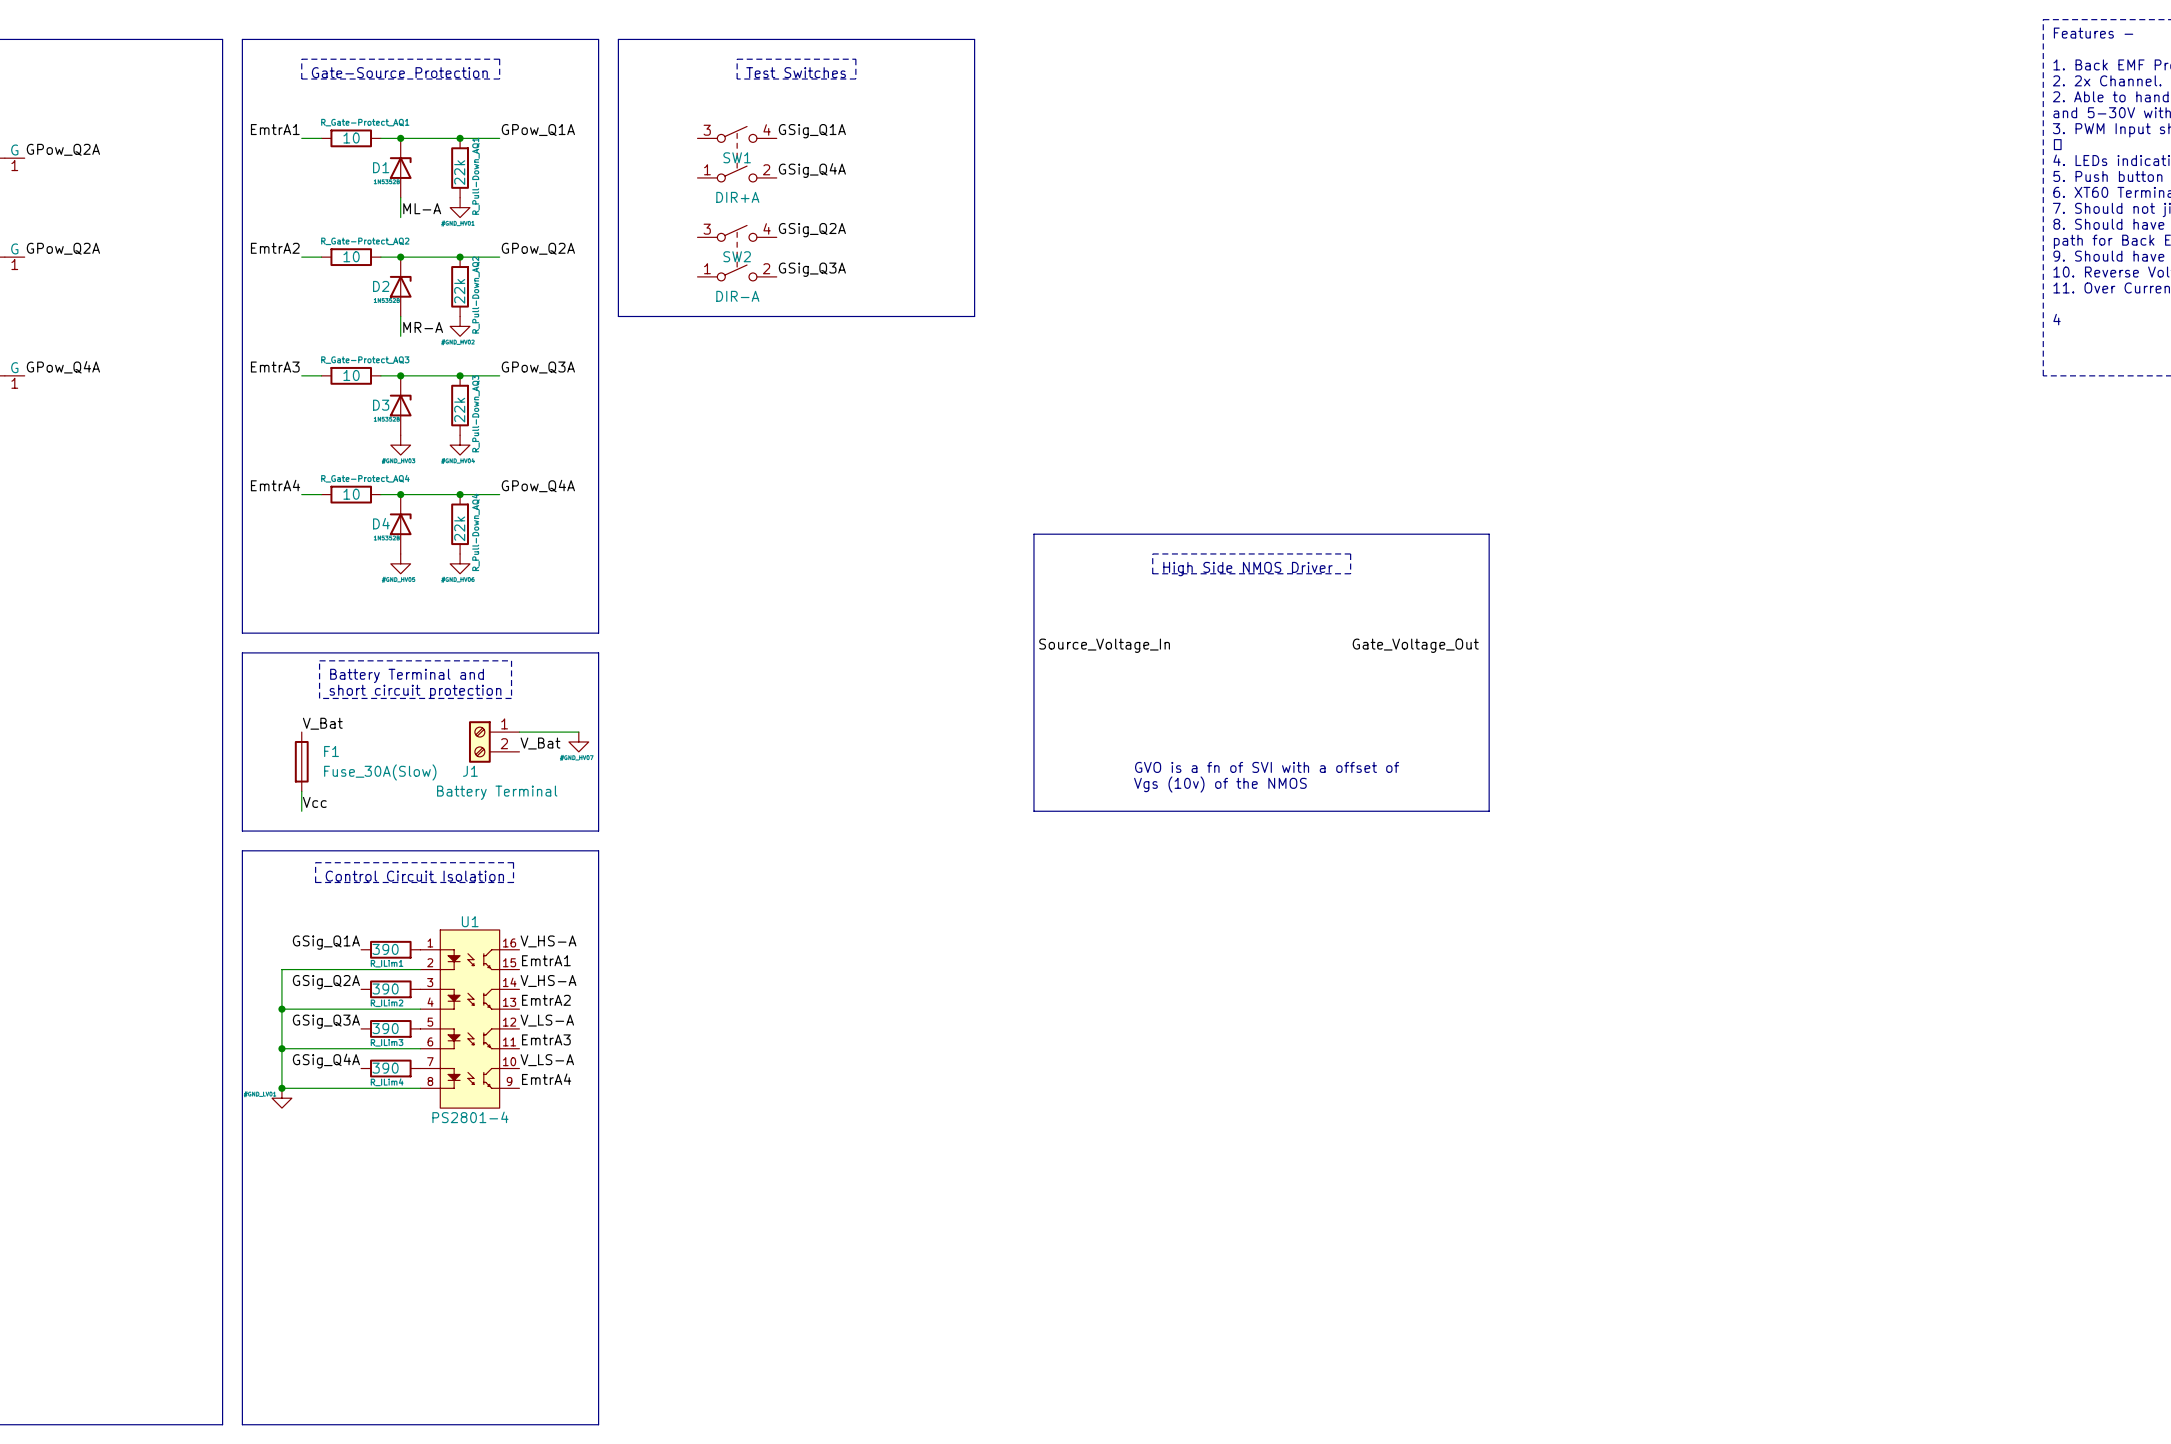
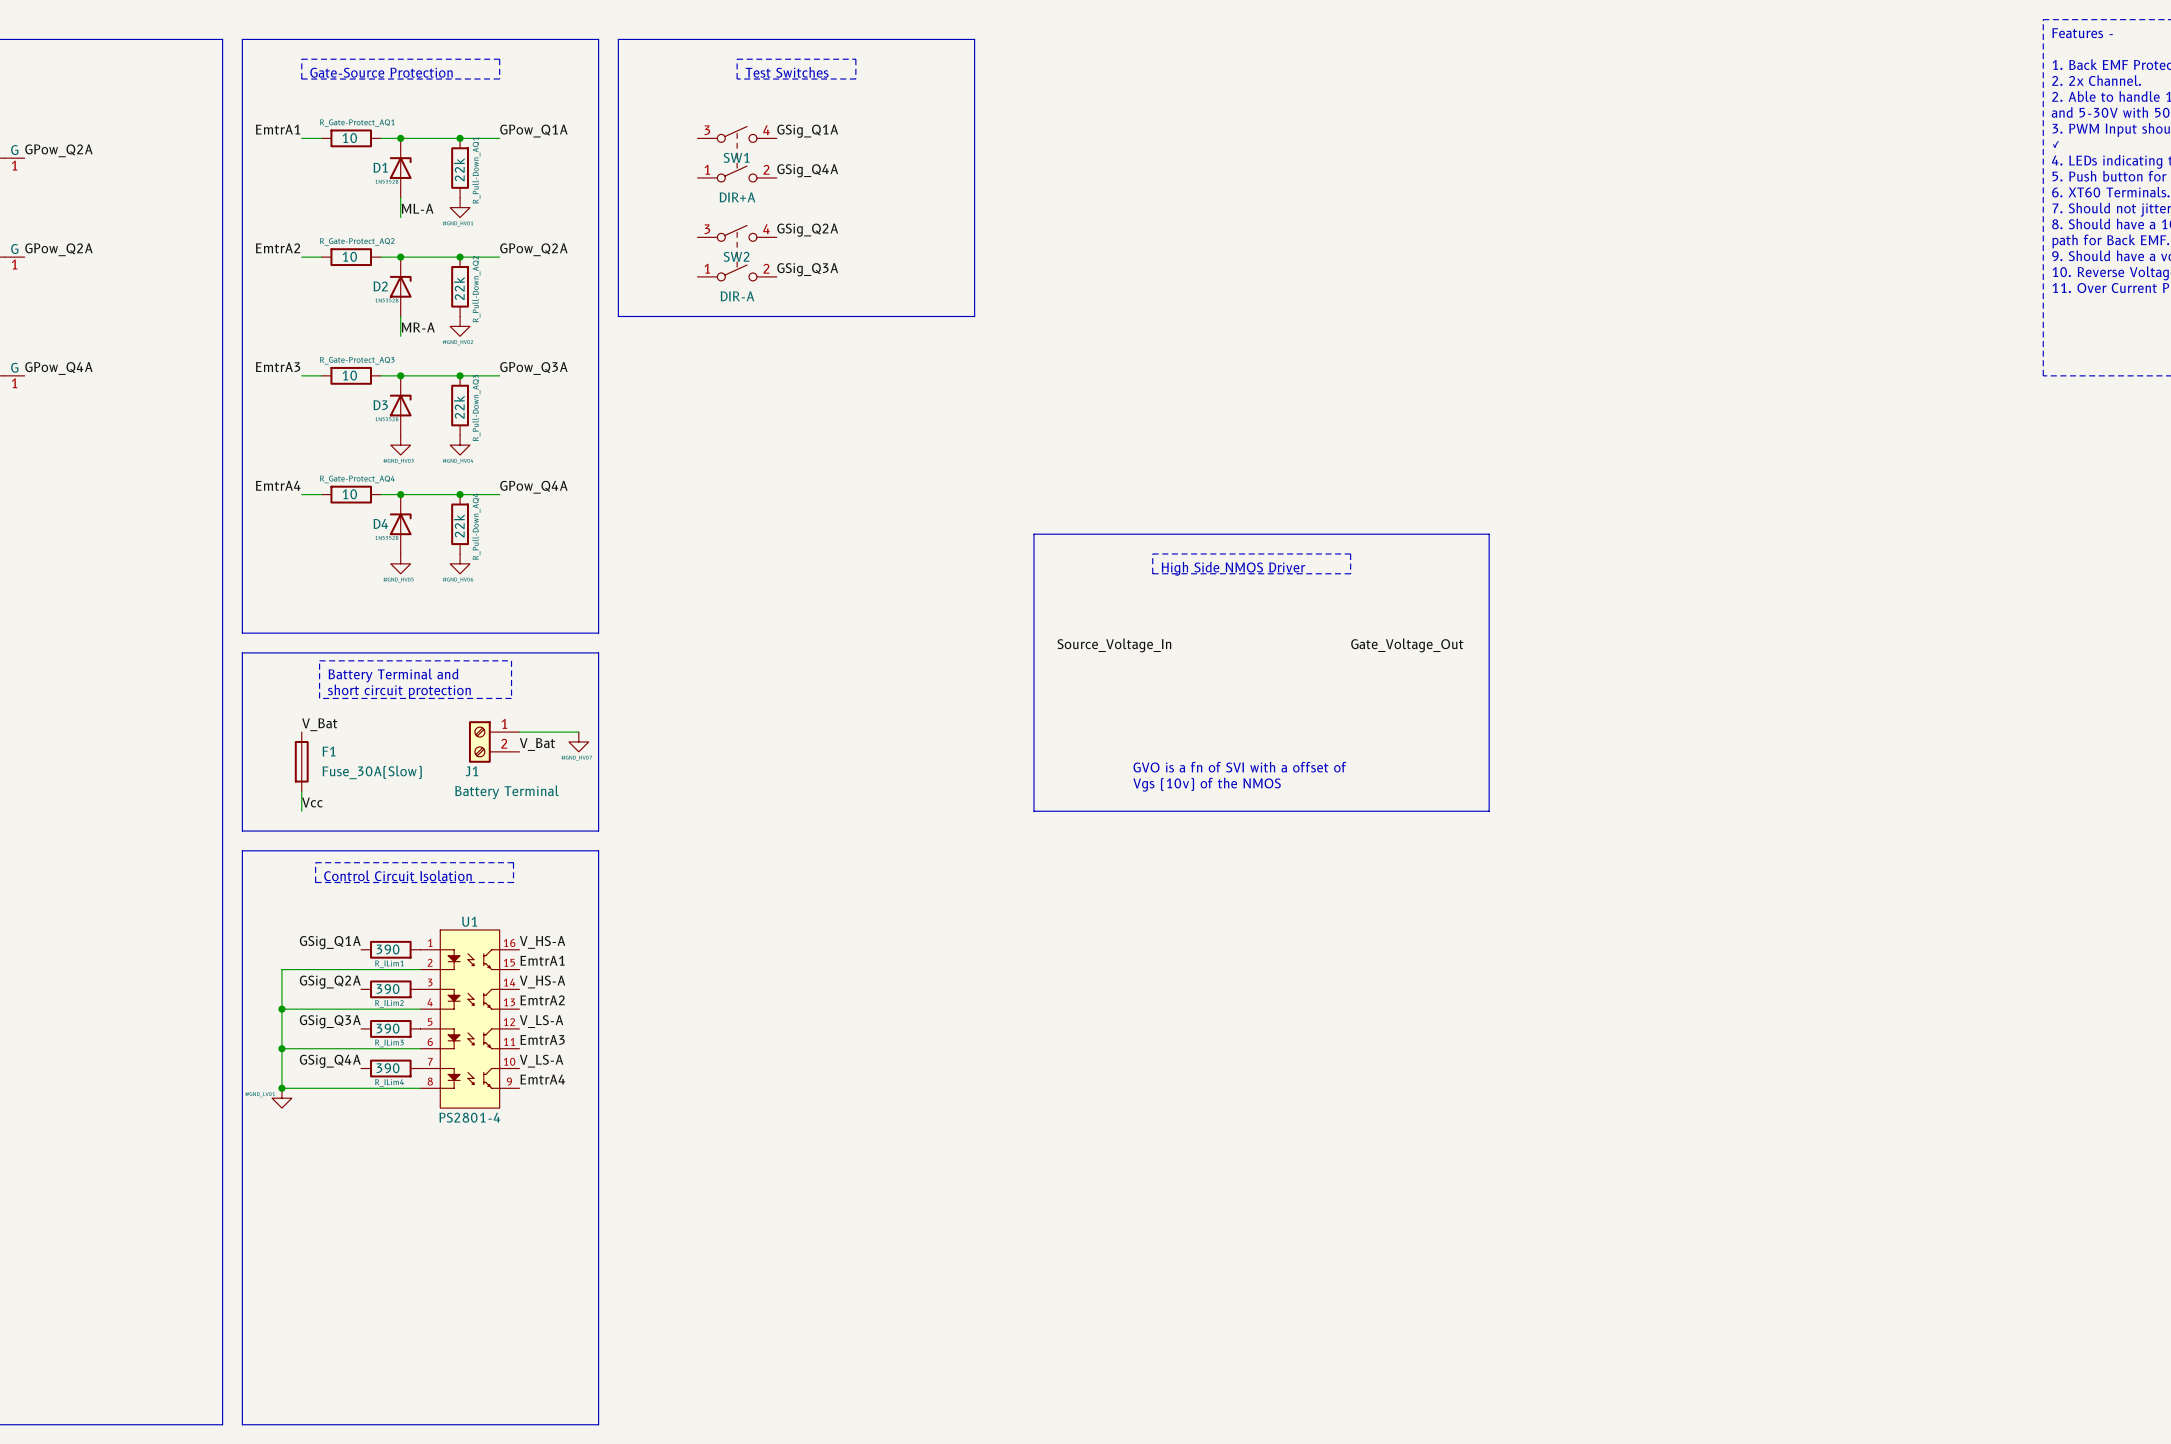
text: 4 (2057, 319) -> none

